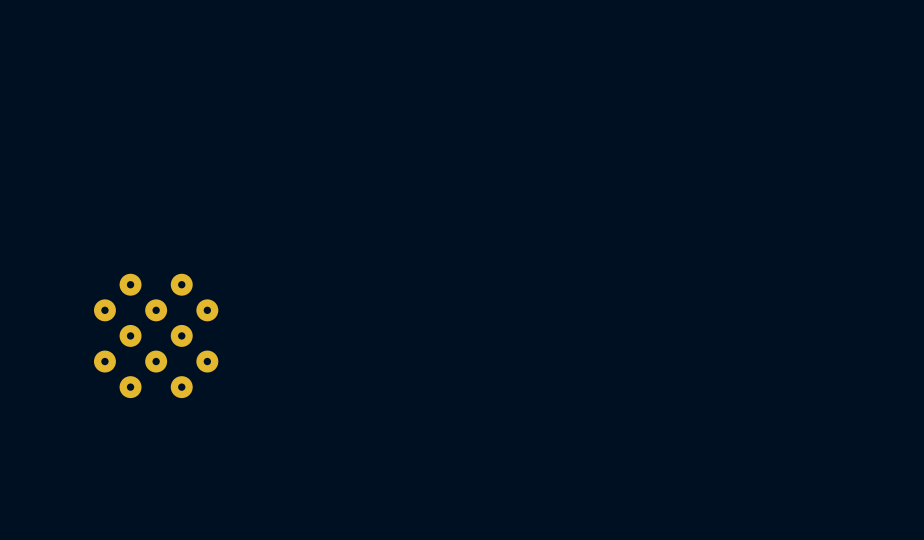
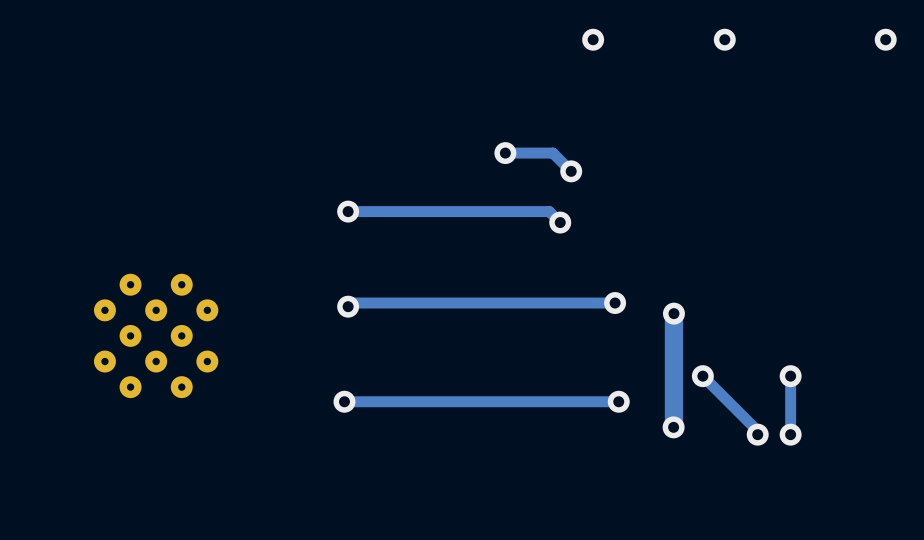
via: none -> (593, 39)
via: none -> (724, 39)
via: none -> (885, 39)
track: none -> (505, 153) (552, 153) (571, 171)
via: none -> (505, 153)
via: none -> (571, 171)
track: none -> (348, 211) (549, 211) (560, 222)
via: none -> (348, 211)
via: none -> (560, 222)
track: none -> (615, 303) (351, 303) (348, 306)
via: none -> (615, 303)
via: none -> (348, 306)
track: none -> (673, 313) (673, 427)
via: none -> (673, 313)
track: none -> (702, 376) (757, 431) (757, 434)
via: none -> (702, 376)
track: none -> (790, 376) (790, 434)
via: none -> (790, 376)
via: none -> (344, 401)
track: none -> (618, 401) (344, 401)
via: none -> (618, 401)
via: none -> (673, 427)
via: none -> (757, 434)
via: none -> (790, 434)

